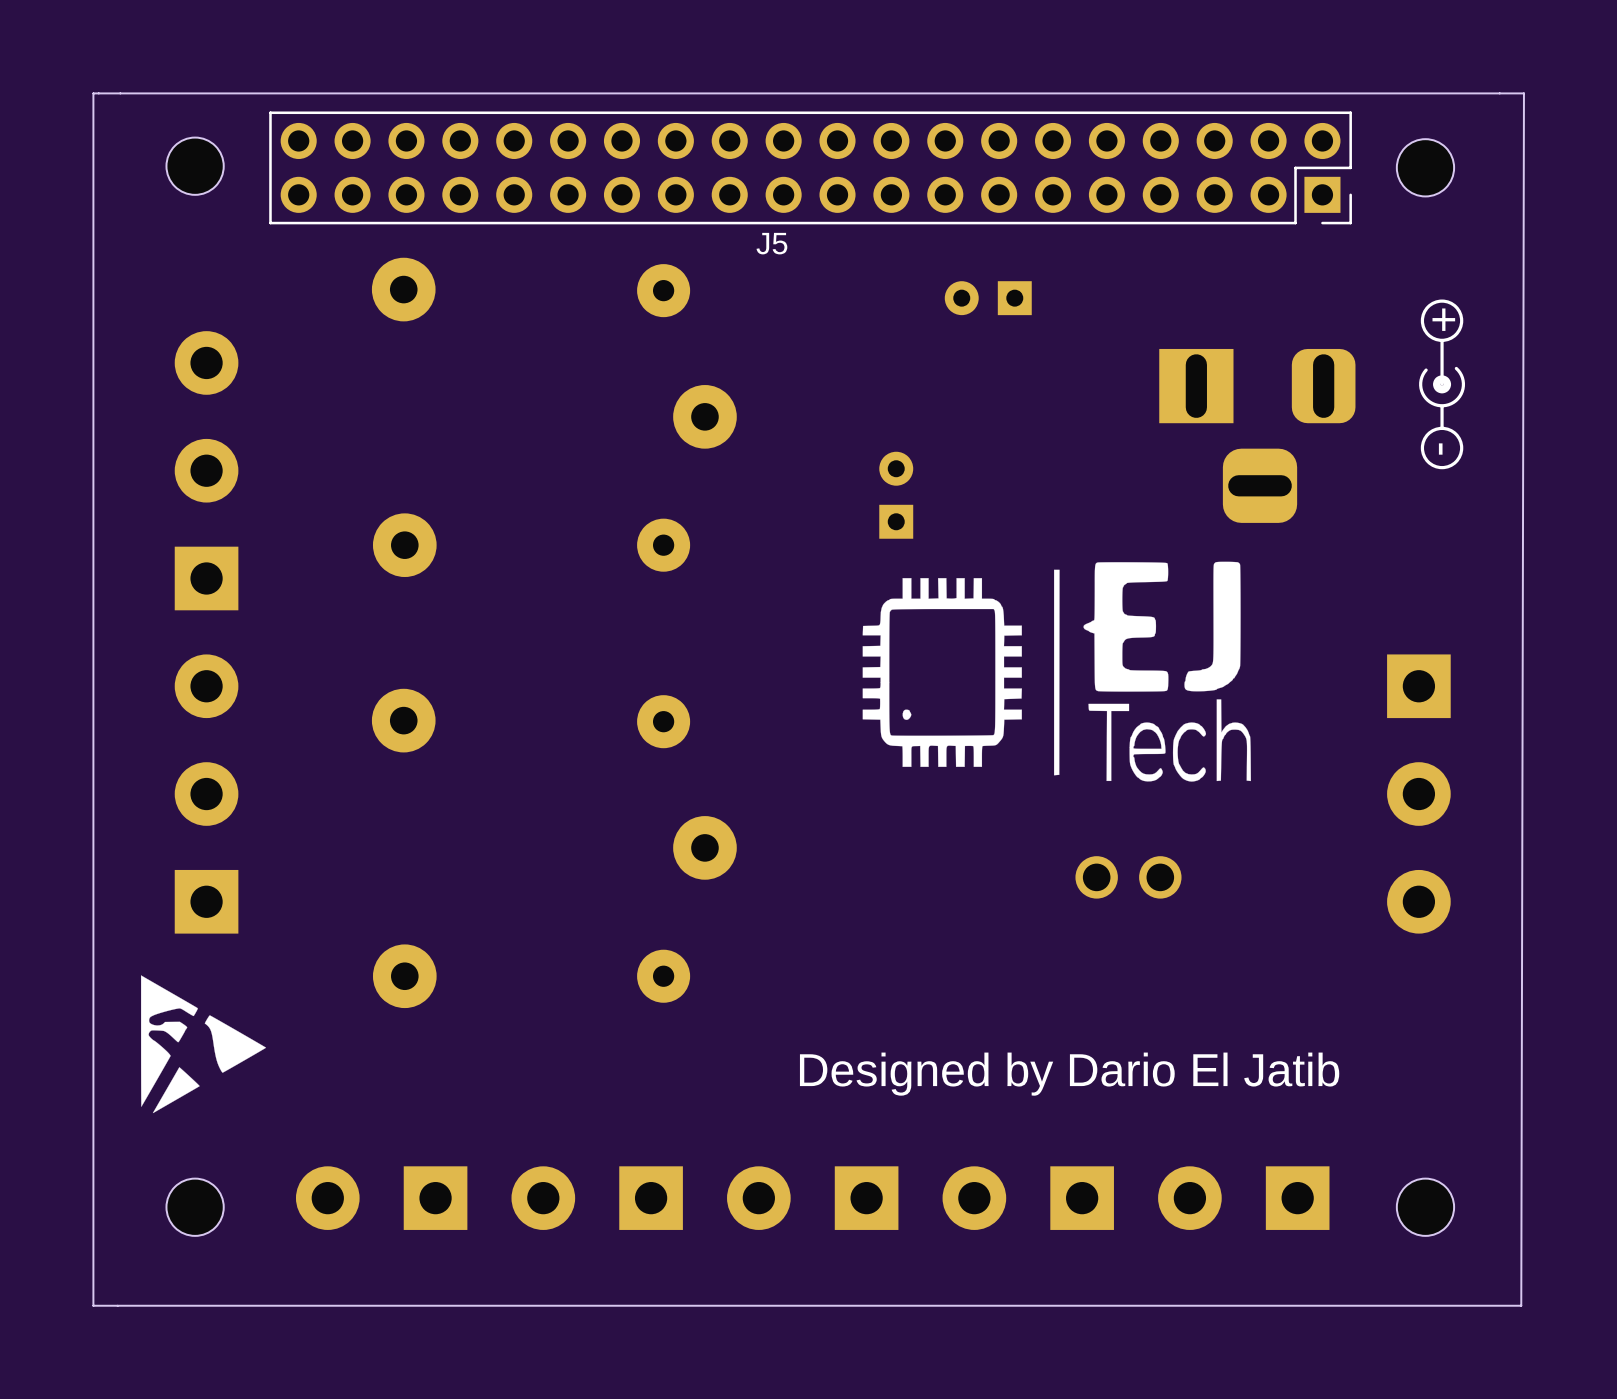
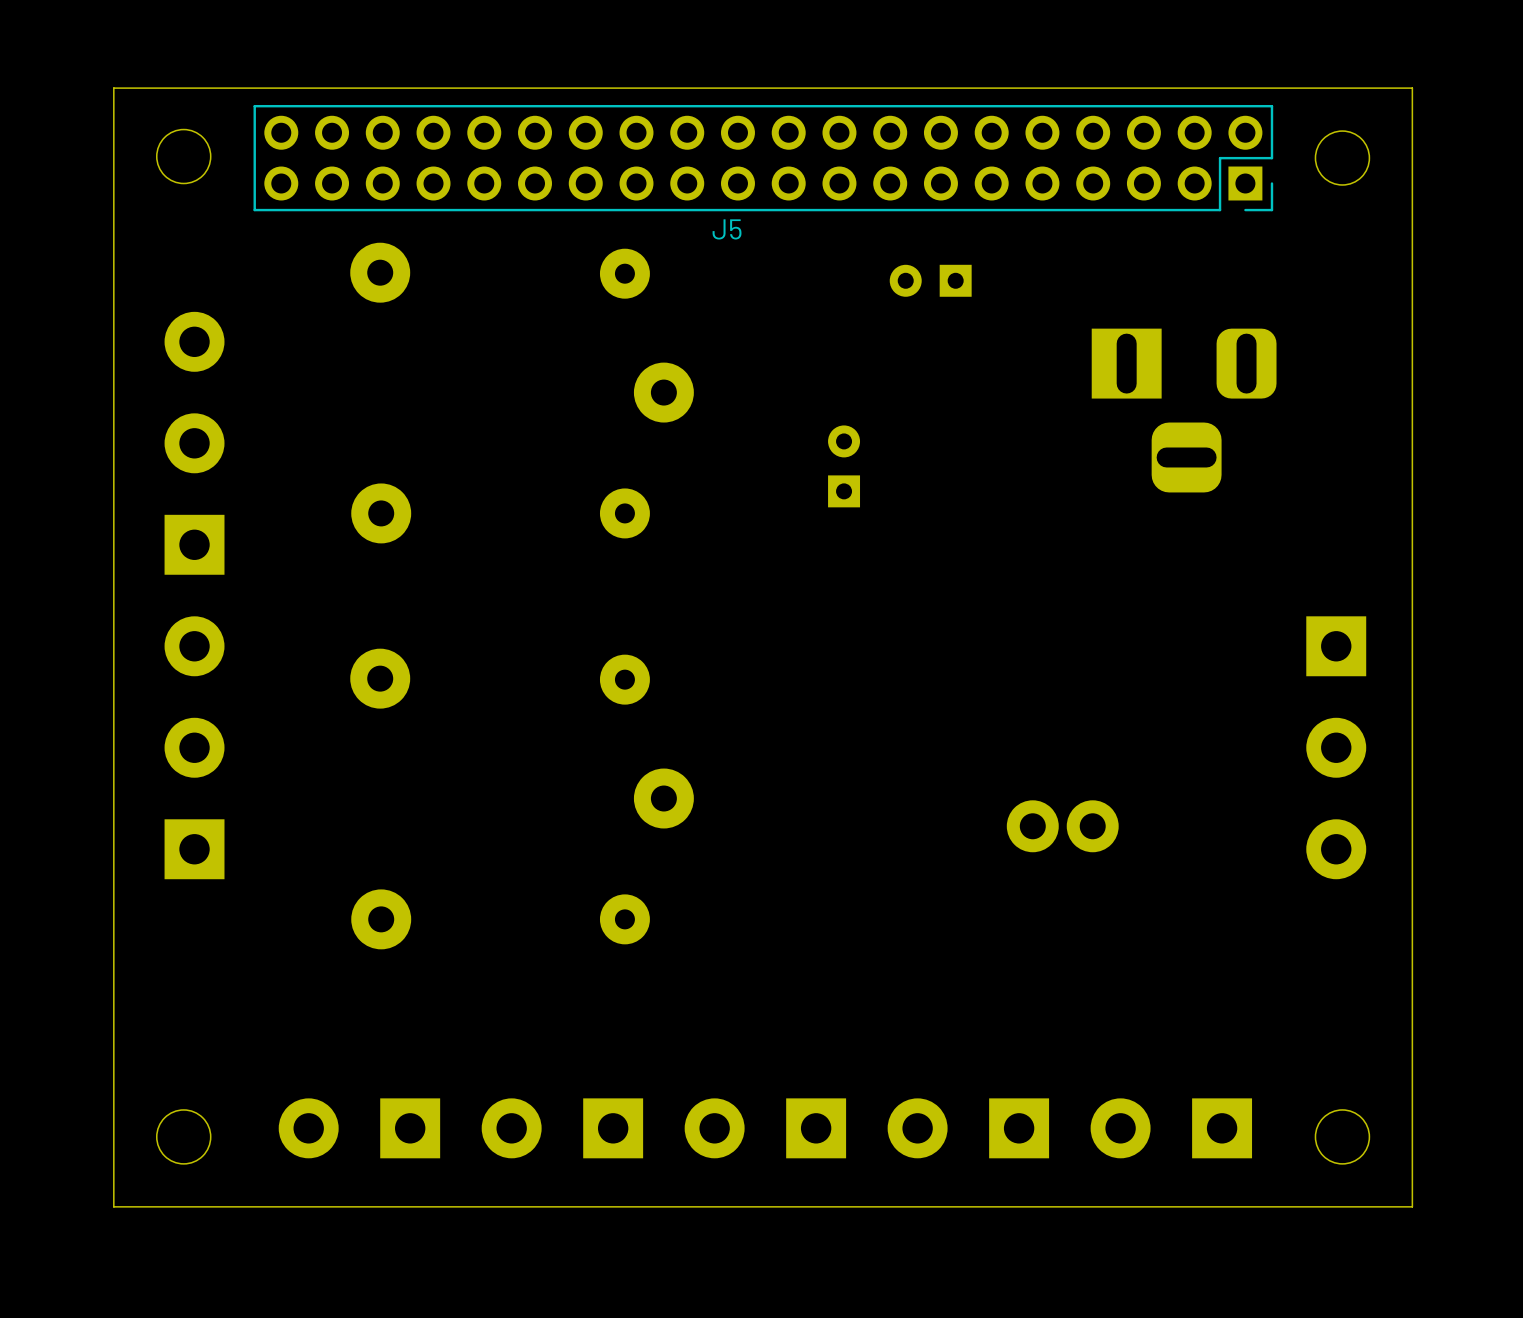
board edge: (1523, 93) (93, 93) (93, 1305) (1521, 1305) (1523, 93) -> (1412, 88) (1412, 1206) (113, 1206) (113, 88) (1412, 88)
drawing: [1419, 299, 1466, 470] -> none
text: + (1443, 319) -> none
text: - (1440, 449) -> none
drawing: [862, 561, 1251, 782] -> none
part footprint: [1075, 856, 1182, 899] -> [1006, 800, 1119, 853]
drawing: [141, 975, 267, 1114] -> none
text: Designed by Dario El Jatib (1069, 1074) -> none

